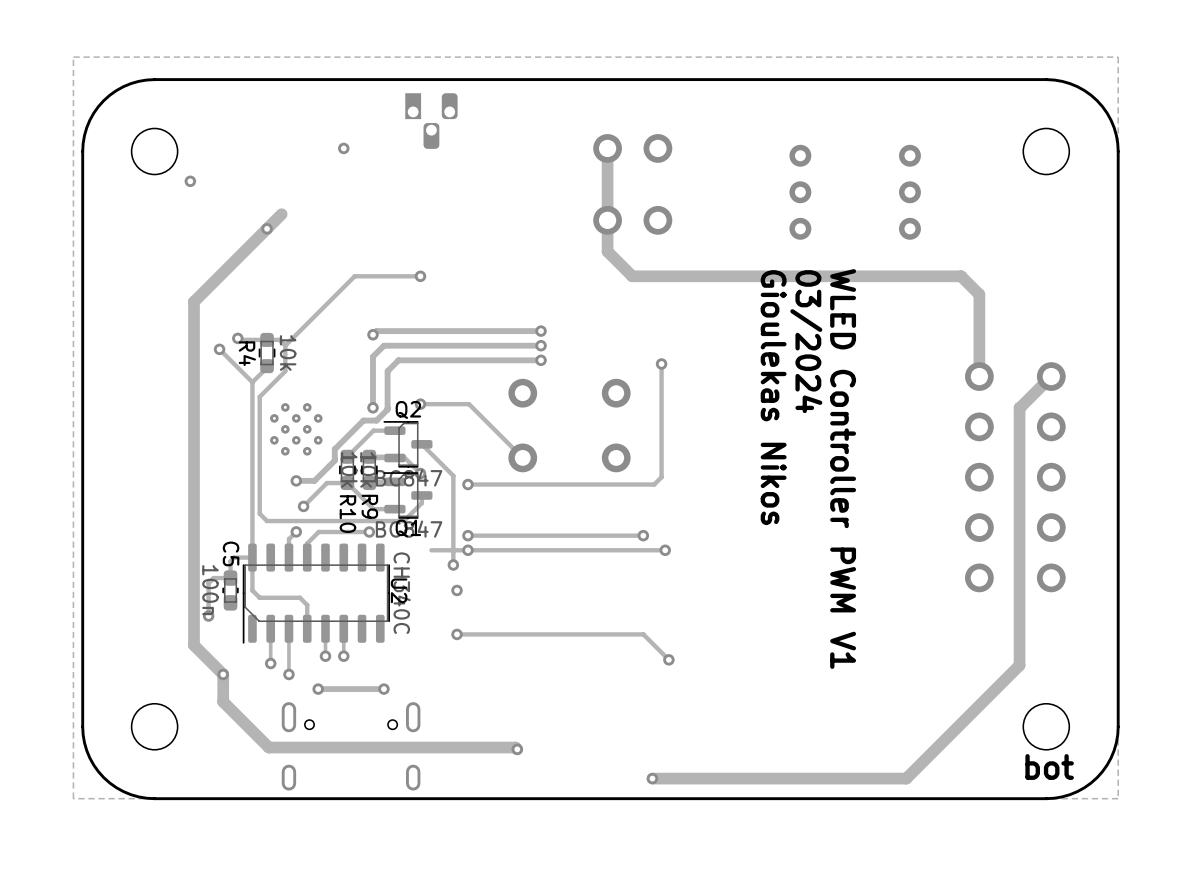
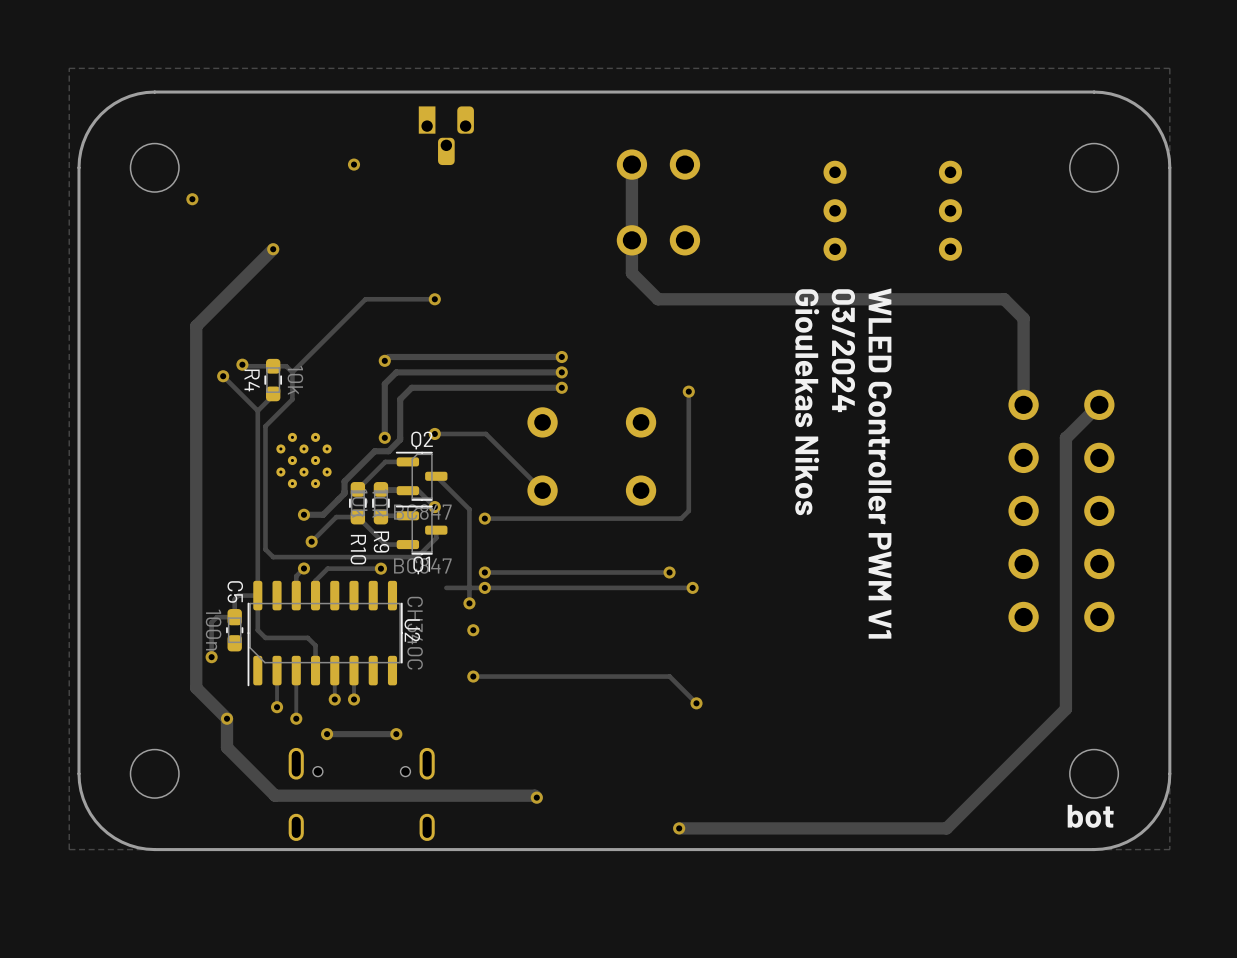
track: (281, 214) (267, 228) -> none

